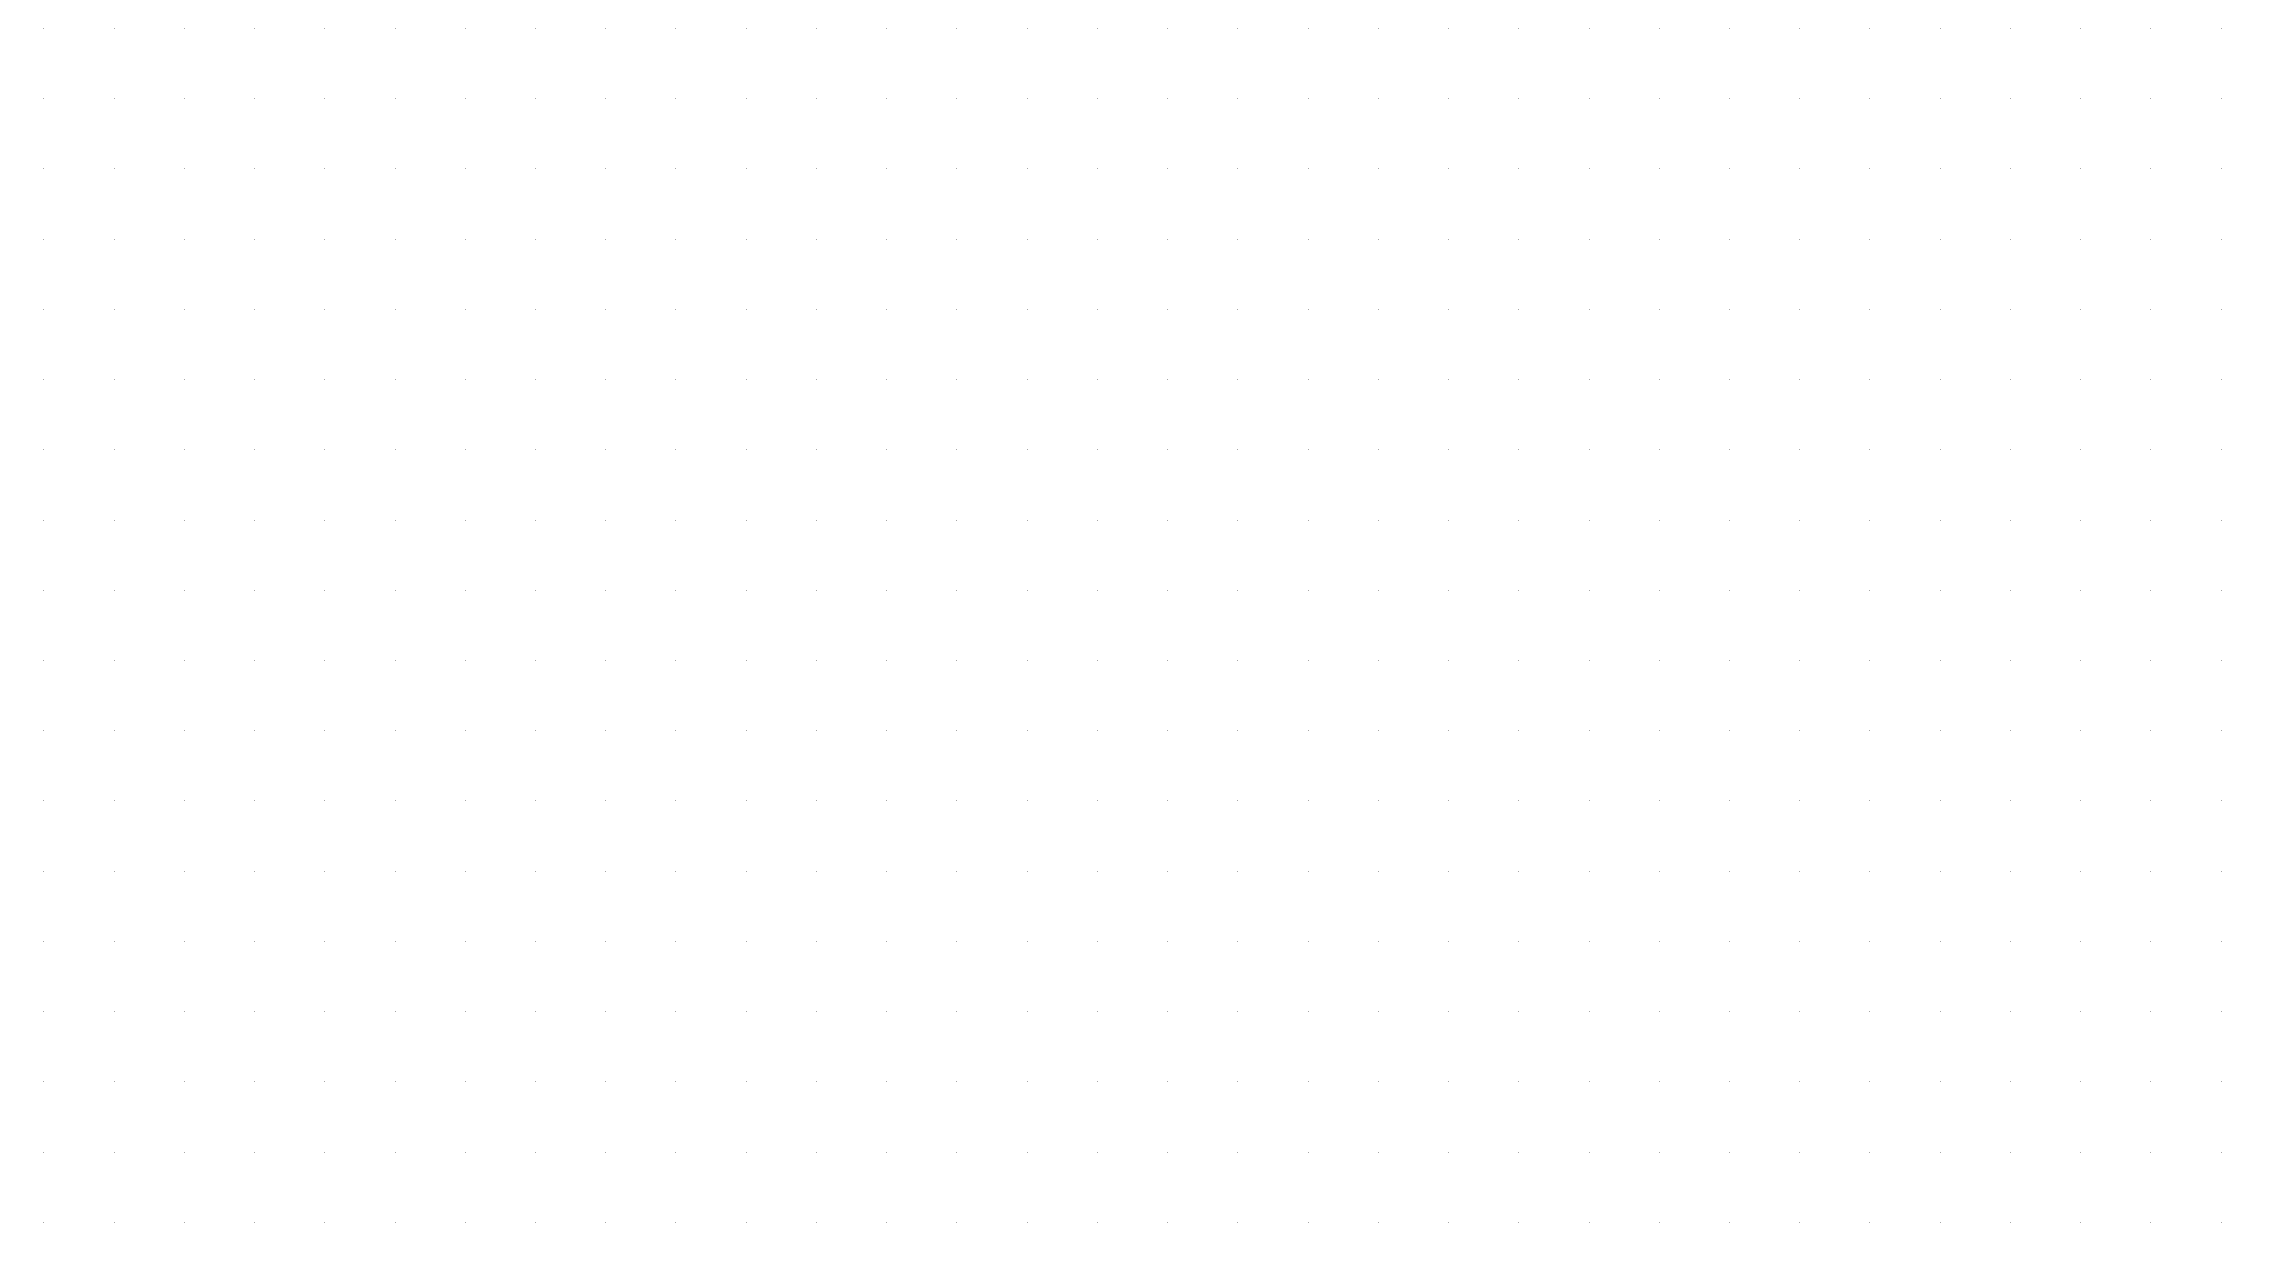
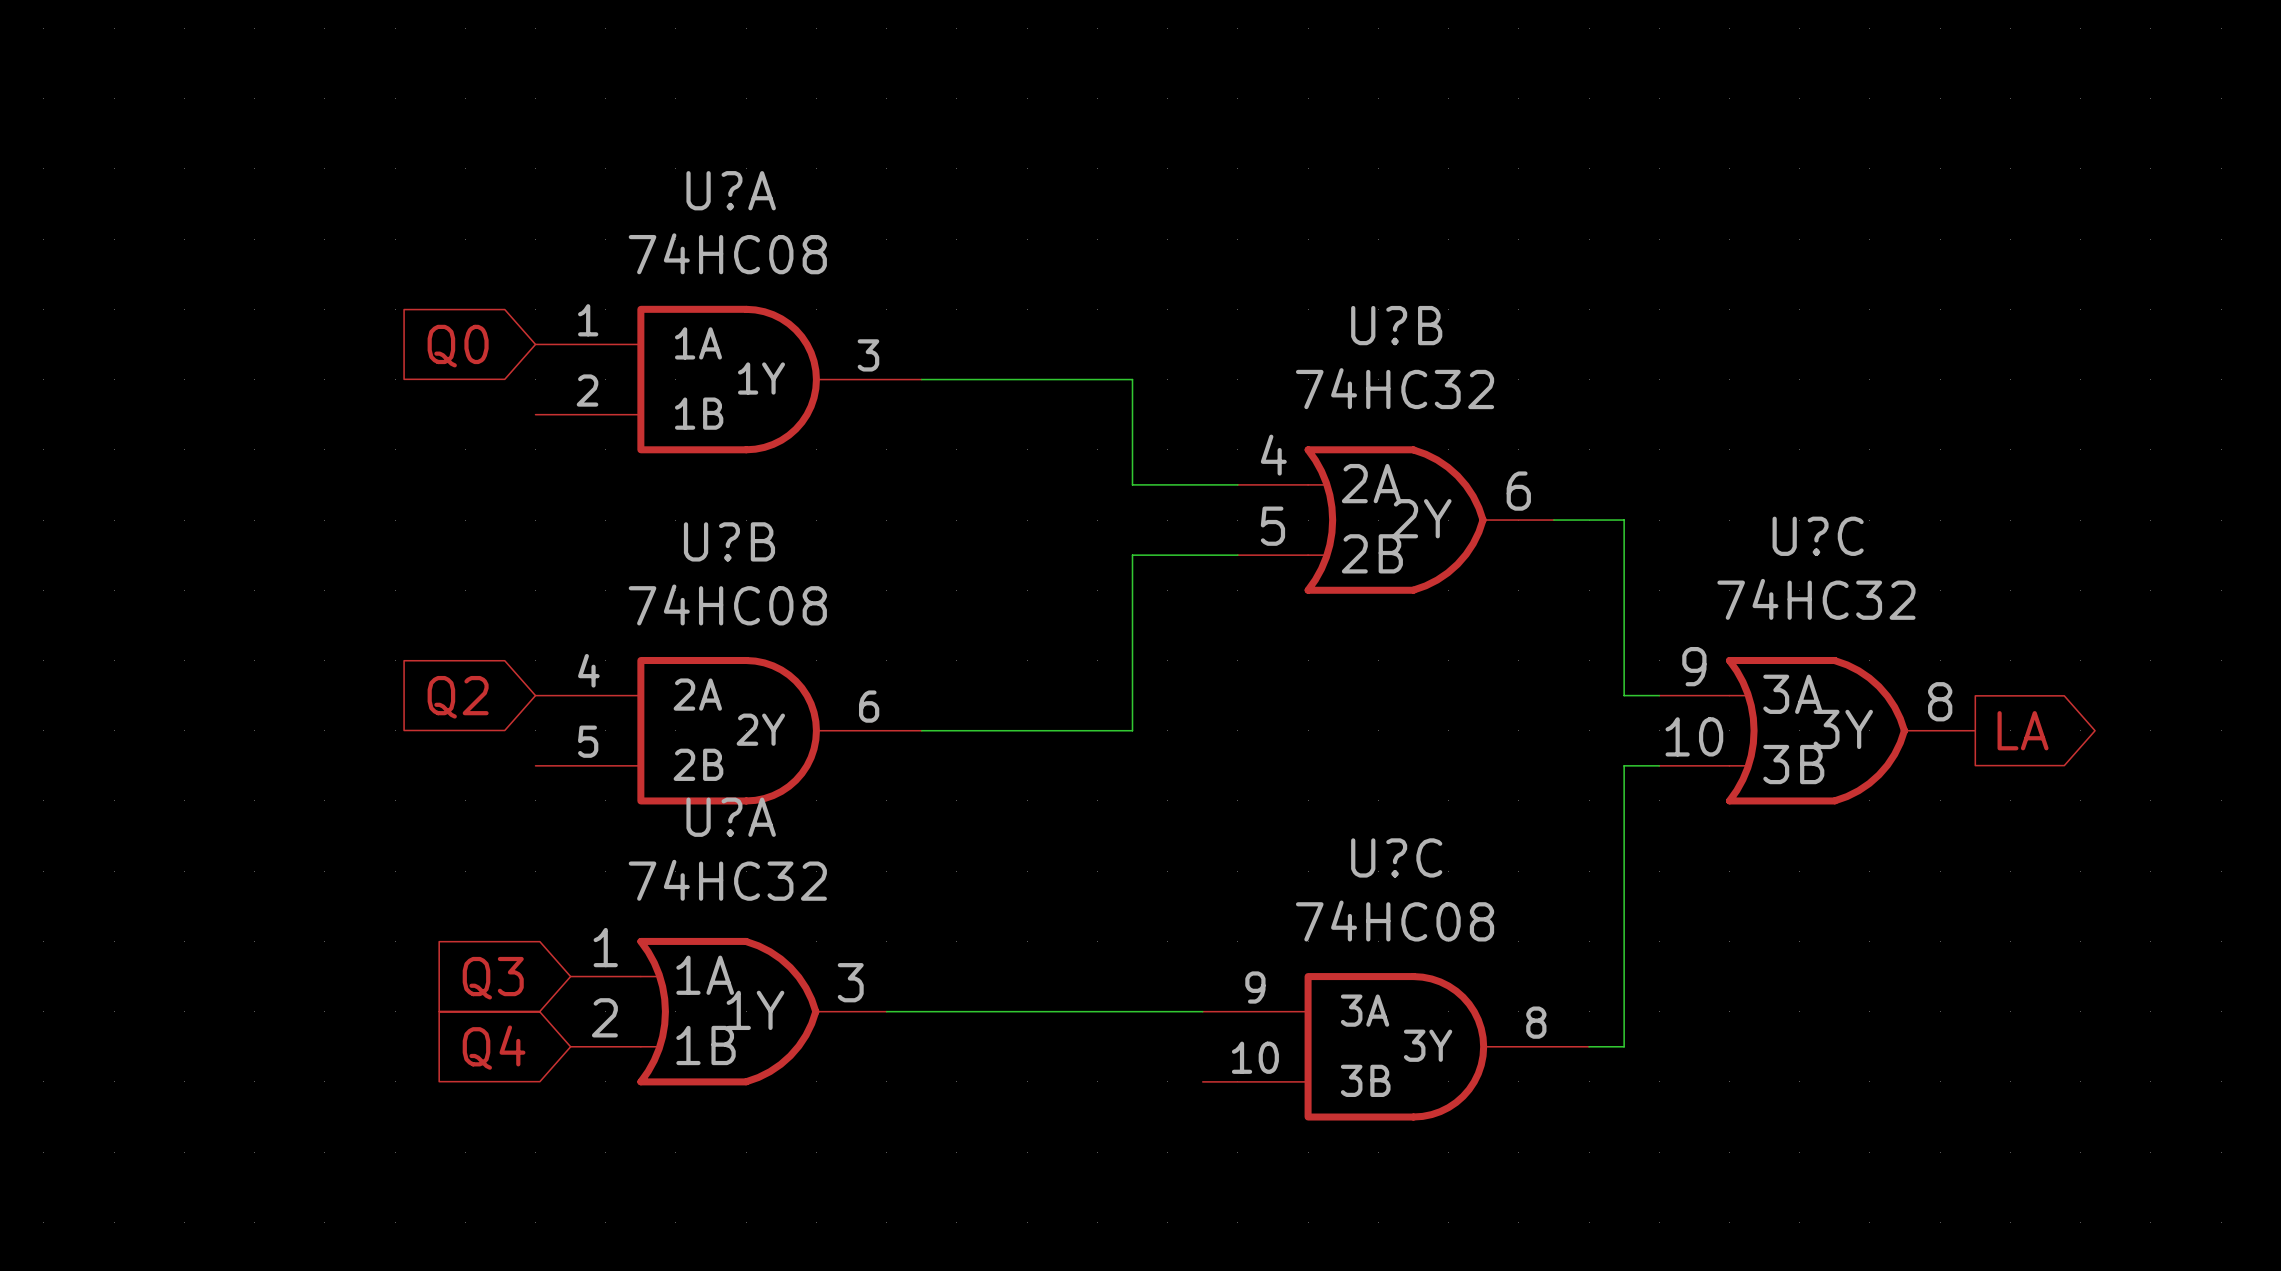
global label: none -> Q0 (458, 346)
U?A: none -> 74HC08 (728, 379)
wire: none -> (921, 379) (1132, 379) (1132, 484) (1237, 484)
U?B: none -> 74HC32 (1395, 520)
wire: none -> (1553, 520) (1624, 520) (1624, 695) (1659, 695)
wire: none -> (1237, 555) (1132, 555) (1132, 730) (921, 730)
global label: none -> Q2 (458, 697)
U?B: none -> 74HC08 (728, 730)
U?C: none -> 74HC32 (1817, 730)
global label: none -> LA (2023, 730)
wire: none -> (1659, 765) (1624, 765) (1624, 1046) (1589, 1046)
global label: none -> Q3 (493, 978)
U?A: none -> 74HC32 (728, 1011)
wire: none -> (886, 1011) (1202, 1011)
U?C: none -> 74HC08 (1395, 1046)
global label: none -> Q4 (494, 1047)

